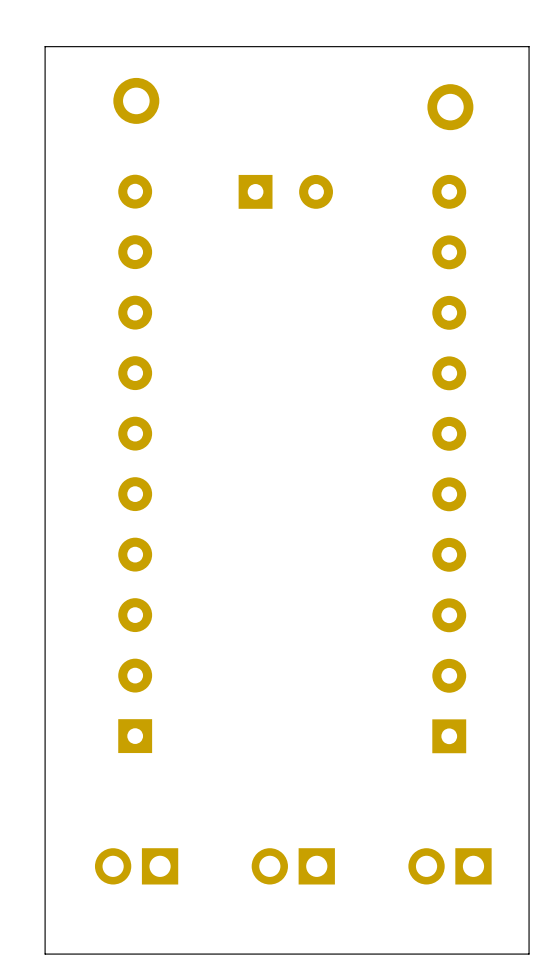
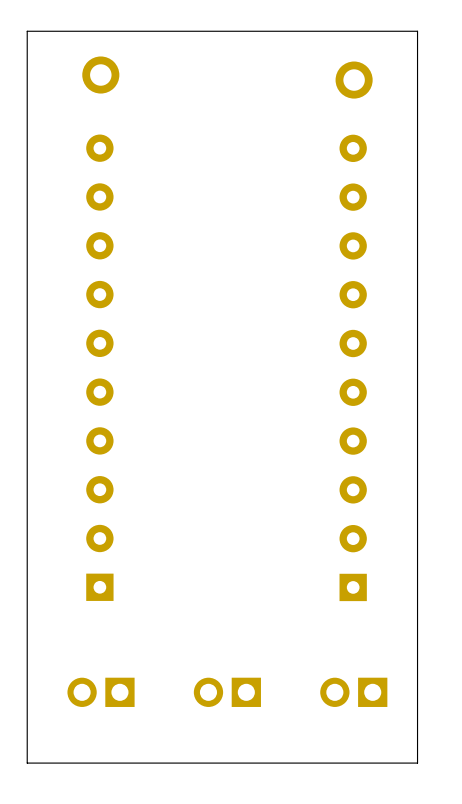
part: (285, 191) -> none

